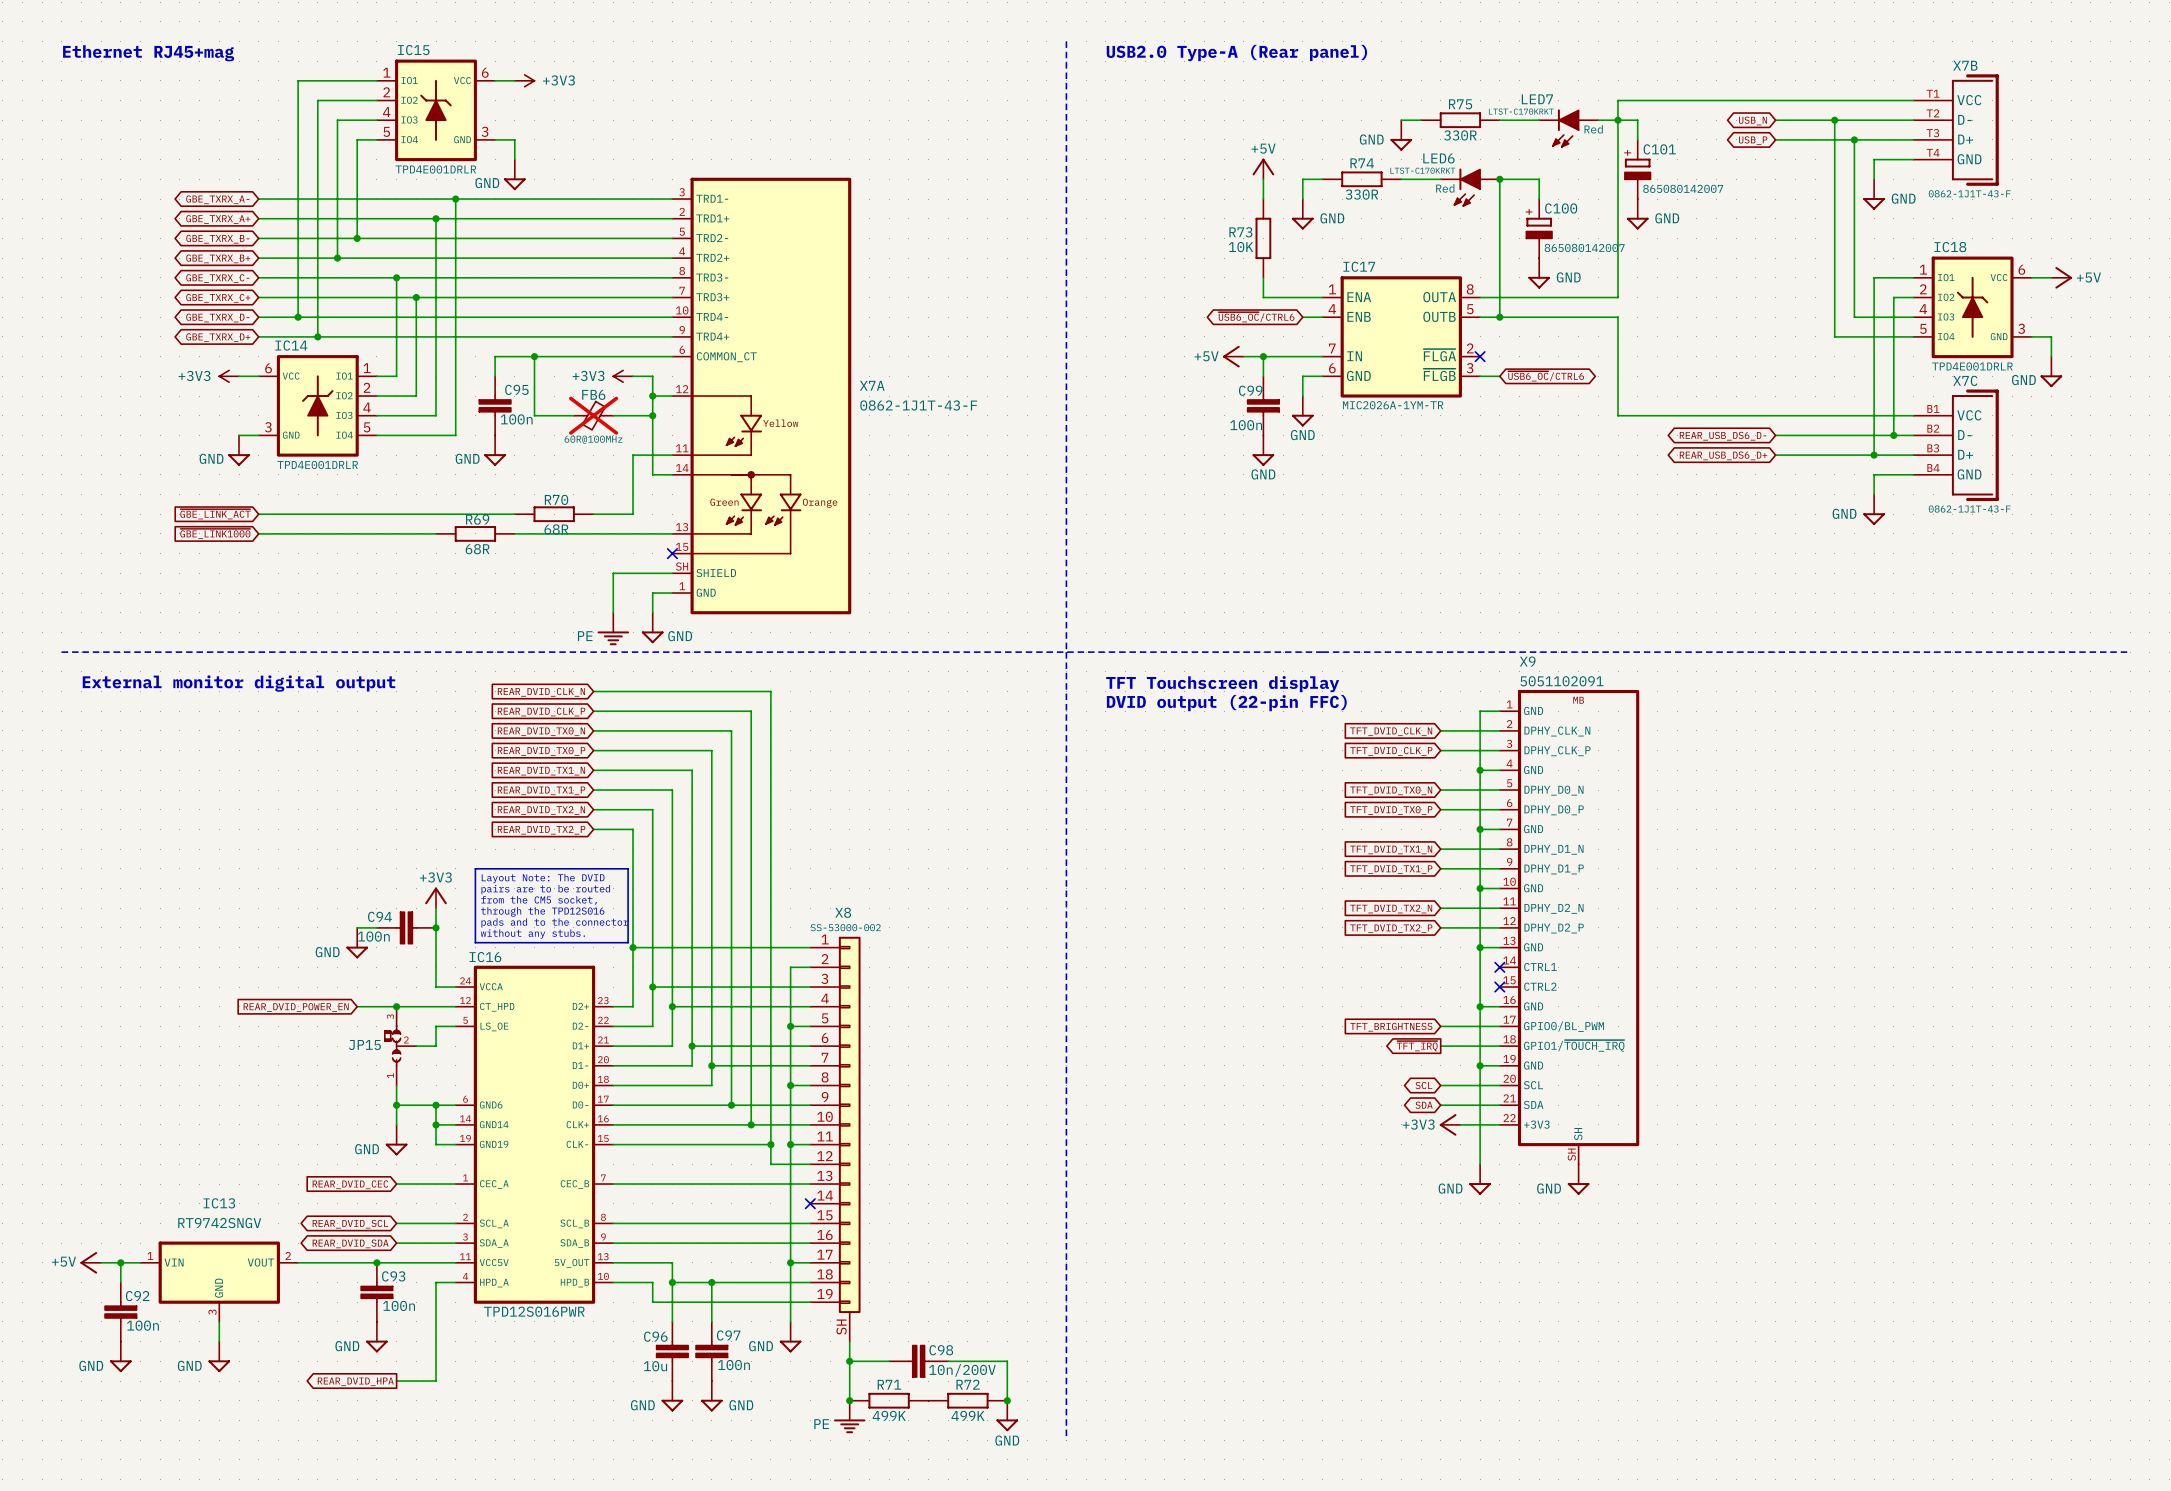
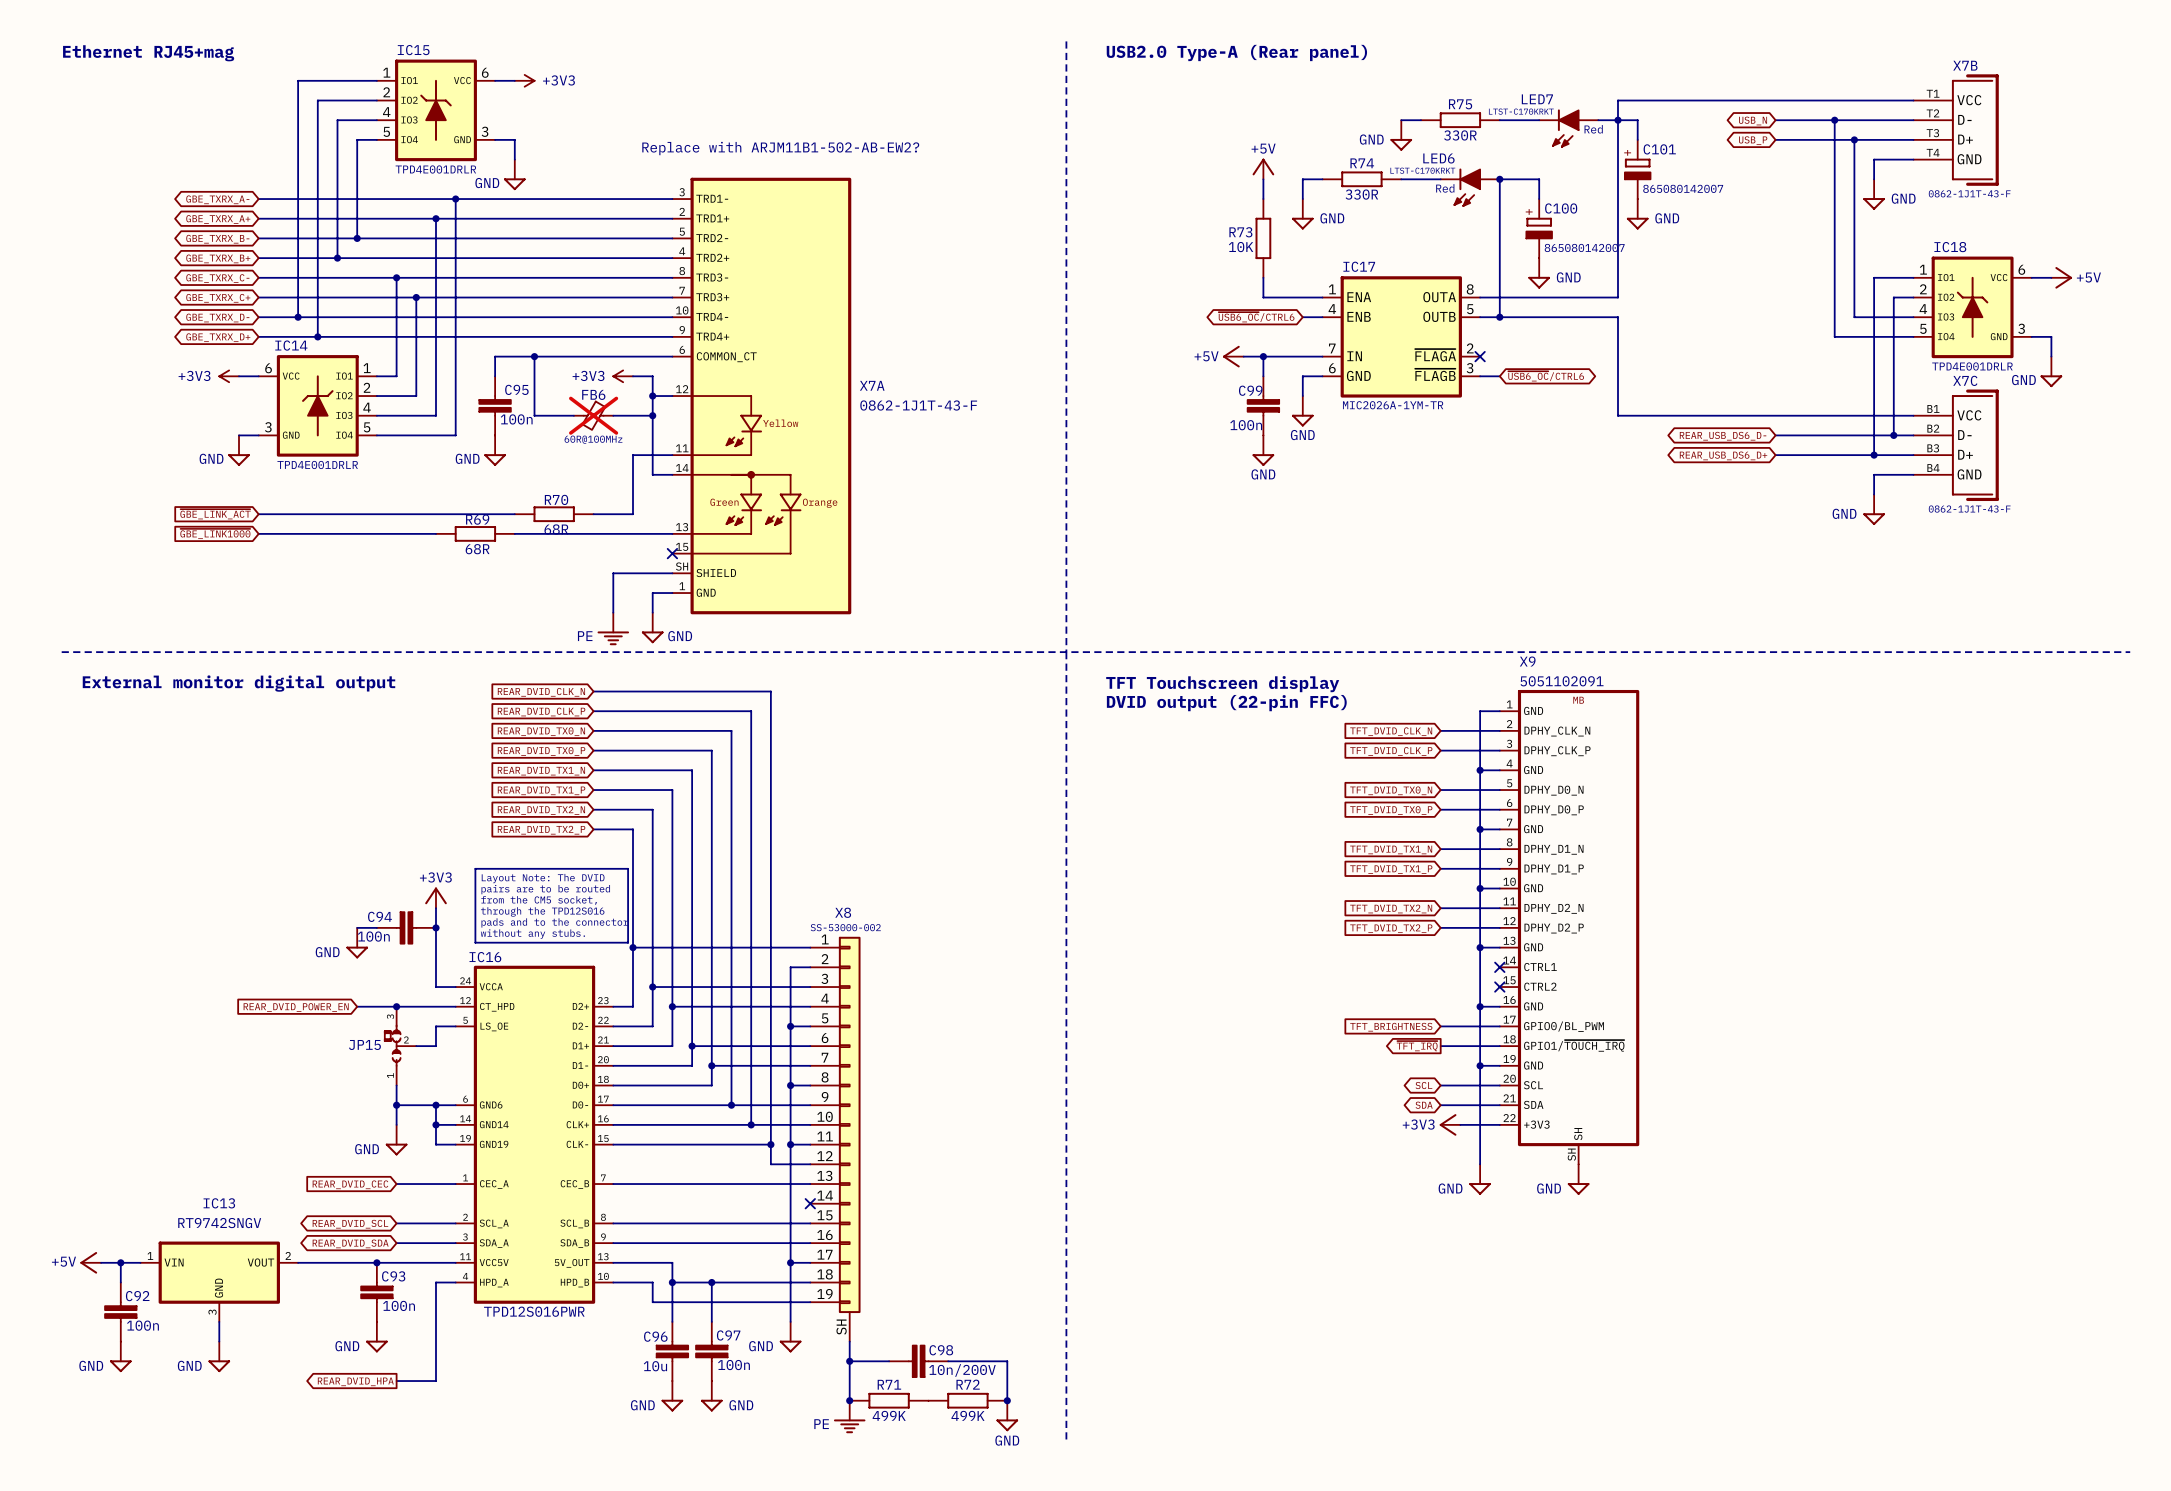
text: none -> Replace with ARJM11B1-502-AB-EW2? (780, 148)
IC17 pin name: ~{FLGA} (1439, 355) -> ~{FLAGA} (1435, 355)
IC17 pin name: ~{FLGB} (1439, 374) -> ~{FLAGB} (1435, 374)

